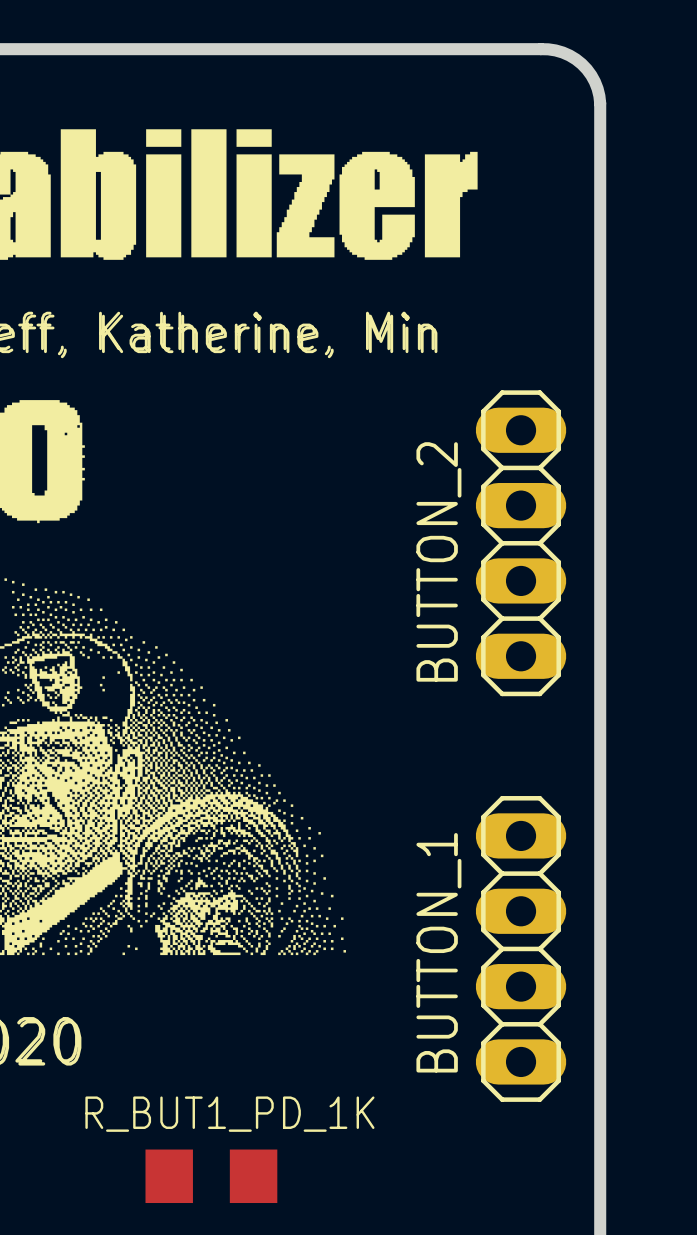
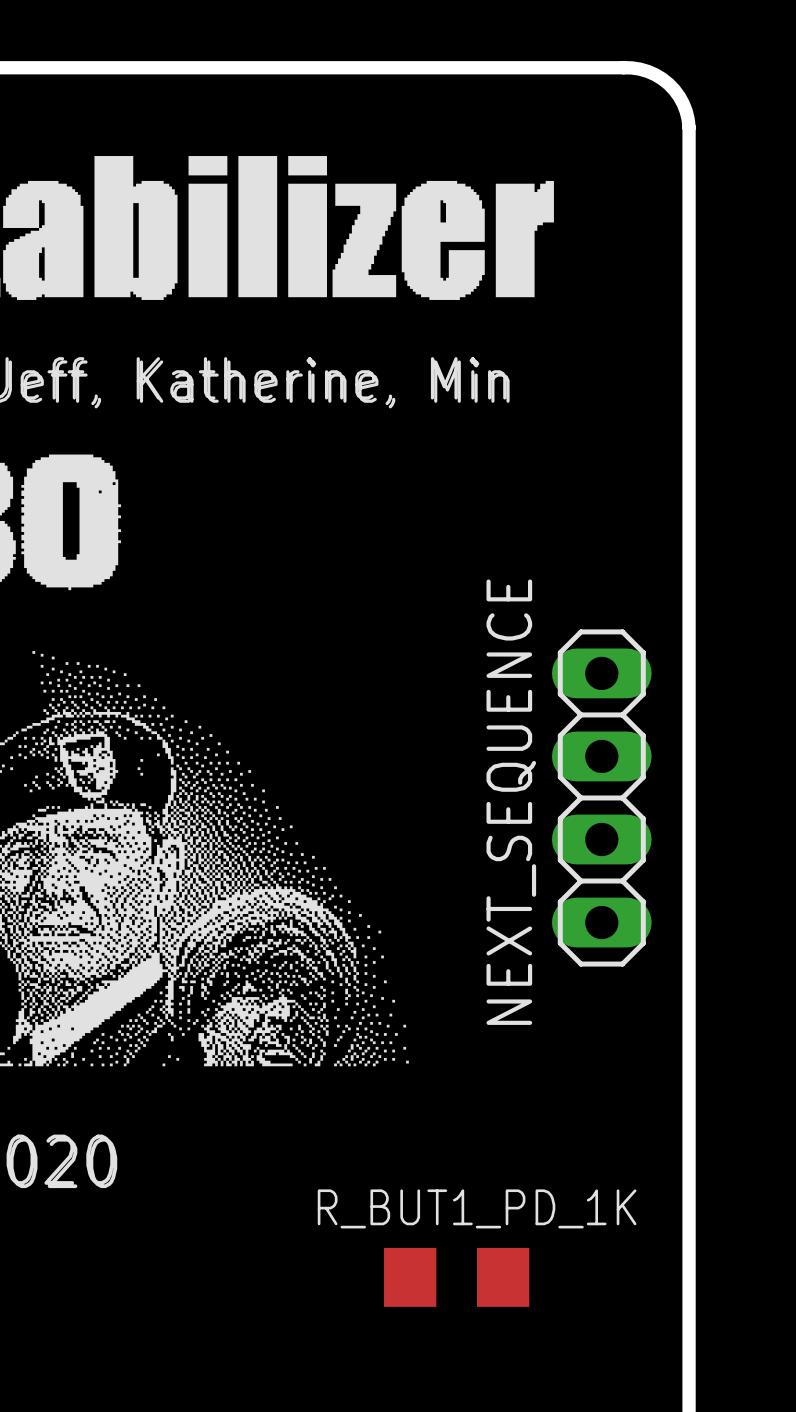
BUTTON_2: (521, 543) -> none
NEXT_SEQUENCE: none -> (601, 797)
BUTTON_1: (521, 948) -> none
R_BUT1_PD_1K position: (211, 1176) -> (456, 1277)

